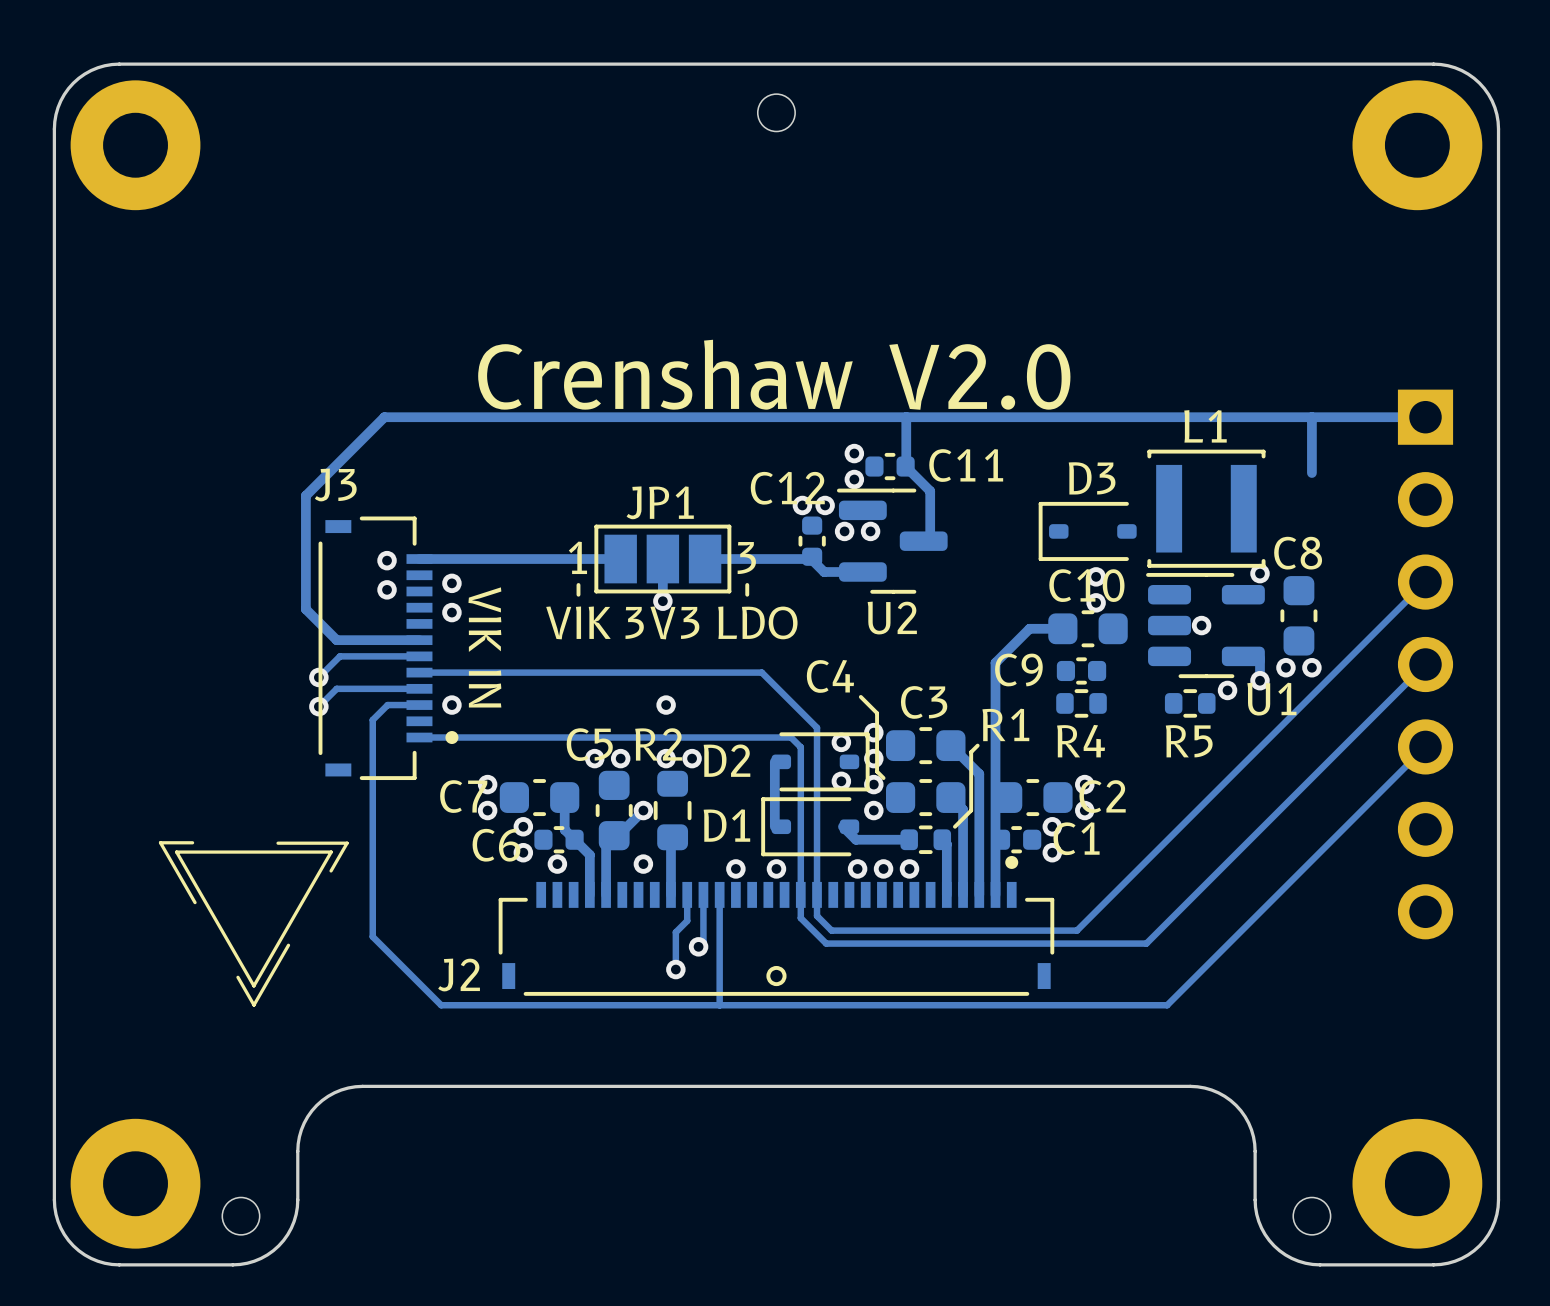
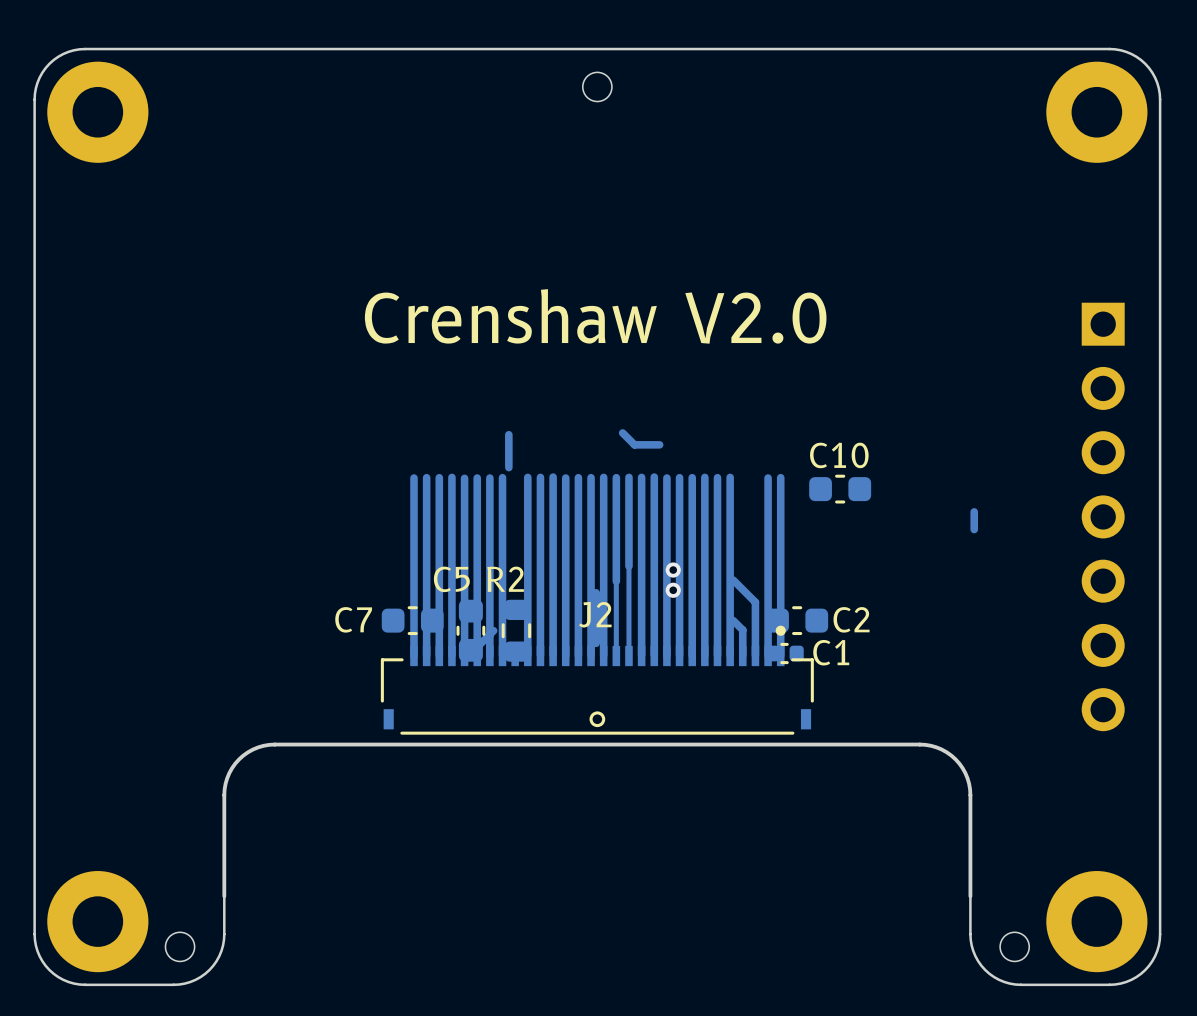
text position: Crenshaw V2.0 (774, 374) -> Crenshaw V2.0 (595, 316)
track: (906, 417) (906, 465) -> none
track: (1311, 417) (1311, 473) -> none
track: (1425, 417) (384, 417) (305, 495) (305, 609) (336, 640) (419, 640) -> none
via: (854, 453) -> none
C11: (890, 466) -> none
track: (905, 466) (930, 491) (930, 541) -> none
via: (854, 479) -> none
via: (802, 505) -> none
via: (825, 505) -> none
L1: (1206, 508) -> none
via: (844, 531) -> none
via: (870, 531) -> none
D3: (1087, 531) -> none
C12: (812, 541) -> none
U2: (892, 541) -> none
track: (619, 559) (419, 559) -> none
JP1: (662, 559) -> none
track: (809, 559) (705, 559) -> none
via: (387, 560) -> none
via: (1260, 573) -> none
via: (1096, 576) -> none
track: (1425, 582) (1076, 930) (831, 930) (817, 916) (817, 842) -> none
via: (451, 583) -> none
line: (578, 584) (578, 594) -> none
line: (747, 584) (747, 594) -> none
via: (387, 589) -> none
via: (662, 601) -> none
via: (1096, 602) -> none
via: (451, 612) -> none
track: none -> (451, 477) (451, 655)
track: none -> (527, 477) (527, 655)
track: none -> (540, 477) (540, 655)
track: none -> (553, 477) (553, 655)
track: none -> (603, 477) (603, 655)
track: none -> (641, 477) (641, 655)
track: none -> (654, 477) (654, 655)
track: none -> (704, 477) (704, 655)
track: none -> (730, 477) (730, 655)
track: none -> (413, 478) (413, 656)
track: none -> (426, 477) (426, 655)
track: none -> (439, 477) (439, 655)
track: none -> (464, 478) (464, 656)
track: none -> (477, 478) (477, 656)
track: none -> (489, 478) (489, 656)
track: none -> (502, 477) (502, 655)
track: none -> (565, 478) (565, 656)
track: none -> (578, 477) (578, 655)
track: none -> (591, 477) (591, 655)
track: none -> (666, 478) (666, 656)
track: none -> (679, 477) (679, 655)
track: none -> (692, 477) (692, 655)
track: none -> (717, 477) (717, 655)
track: none -> (780, 477) (780, 655)
C8: (1298, 615) -> none
text: VIK (578, 622) -> none
text: 3V3 (662, 622) -> none
text: LDO (757, 622) -> none
via: (1201, 625) -> none
U1: (1205, 625) -> none
track: (1062, 628) (1029, 628) (995, 662) -> (768, 478) (768, 515)
J3: (388, 648) -> none
track: (419, 656) (339, 656) (318, 677) -> none
track: (1425, 664) (1146, 943) (826, 943) (800, 918) (800, 842) -> none
via: (1285, 667) -> none
via: (1311, 667) -> none
C9: (1081, 670) -> none
track: (419, 672) (761, 672) (817, 727) -> (628, 477) (628, 566)
via: (318, 677) -> none
via: (1260, 680) -> none
track: (419, 688) (336, 688) (318, 706) -> none
via: (1227, 690) -> none
line: (860, 696) (877, 713) (877, 771) (883, 778) -> none
R4: (1081, 703) -> none
R5: (1190, 703) -> none
track: (419, 705) (387, 705) (372, 719) (372, 936) (441, 1005) (1167, 1005) (1425, 746) -> none
via: (451, 705) -> none
via: (666, 705) -> none
via: (318, 706) -> none
track: (419, 737) (791, 737) (800, 747) -> (616, 477) (616, 581)
via: (841, 742) -> none
C3: (925, 745) -> none
line: (977, 745) (971, 752) (971, 810) (954, 826) -> none
via: (594, 758) -> none
via: (620, 758) -> none
via: (666, 758) -> none
via: (692, 758) -> none
D2: (820, 761) -> none
via: (841, 781) -> none
via: (487, 784) -> none
via: (873, 784) -> none
via: (1084, 784) -> none
track: (564, 797) (564, 829) (589, 854) (589, 894) -> none
C4: (925, 797) -> none
via: (487, 810) -> none
via: (643, 810) -> none
via: (873, 810) -> none
via: (1084, 810) -> none
via: (523, 826) -> none
D1: (810, 826) -> none
track: (842, 826) (855, 839) (909, 839) -> none
via: (1052, 826) -> none
track: (614, 835) (606, 843) (606, 894) -> none
C6: (559, 839) -> none
R1: (925, 839) -> none
track: (942, 839) (946, 844) (946, 894) -> none
drawing: [158, 841, 349, 1007] -> none
track: (979, 841) (979, 894) -> none
track: (670, 842) (670, 894) -> none
track: (963, 842) (963, 894) -> none
track: (995, 842) (995, 894) -> none
via: (523, 852) -> none
via: (1052, 852) -> none
via: (557, 864) -> none
via: (643, 864) -> none
via: (735, 868) -> none
via: (776, 868) -> none
via: (857, 868) -> none
via: (883, 868) -> none
via: (909, 868) -> none
track: (687, 894) (687, 920) (675, 932) (675, 969) -> none
track: (703, 894) (703, 941) (698, 946) -> none
track: (719, 894) (719, 1005) -> none
J2 position: (776, 925) -> (597, 680)
via: (698, 946) -> none
via: (675, 969) -> none
J2 name position: J2 (459, 975) -> J2 (595, 614)
board edge: (1255, 1151) (1251, 1129) (1245, 1116) (1236, 1105) (1224, 1096) (1211, 1090) (1190, 1086) (355, 1086) (334, 1092) (322, 1100) (311, 1110) (301, 1129) (297, 1151) -> (970, 896) (970, 795) (967, 778) (962, 768) (951, 755) (936, 747) (919, 744) (263, 745) (252, 749) (239, 759) (232, 768) (225, 783) (224, 896)

